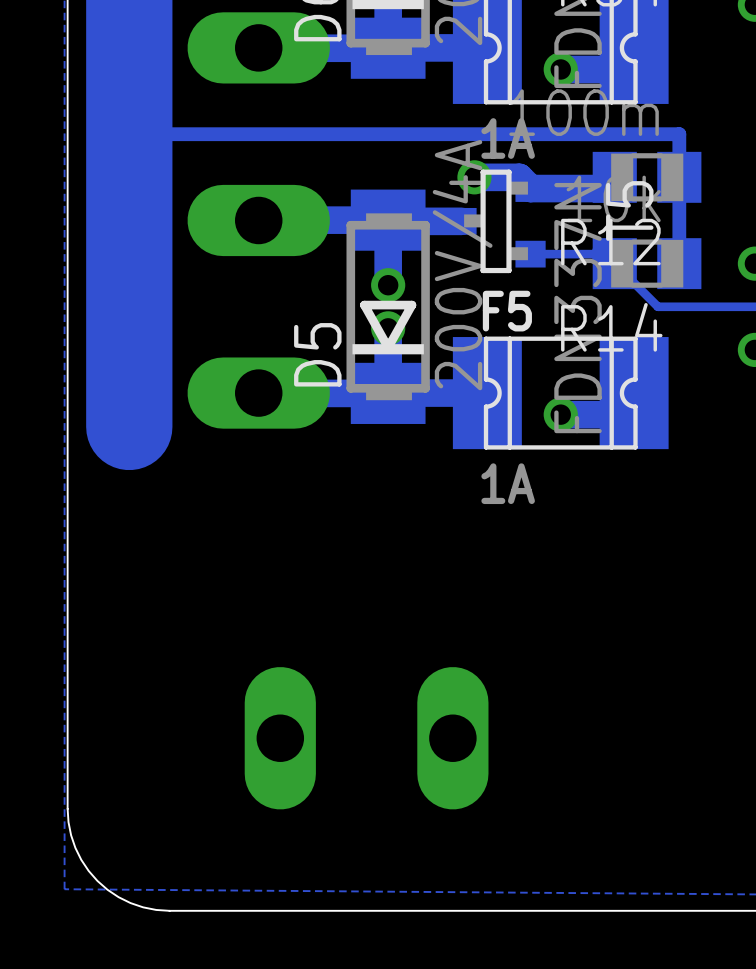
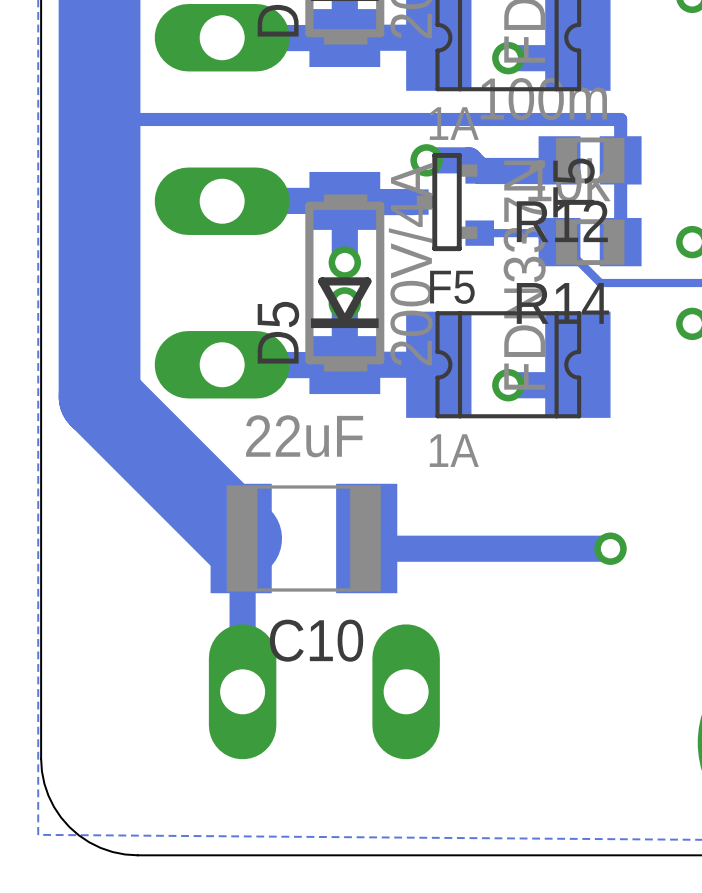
track: none -> (99, 396) (242, 539) (242, 691)
C10: none -> 22uF (303, 538)
track: none -> (366, 538) (376, 548) (610, 548)
via: none -> (610, 548)

